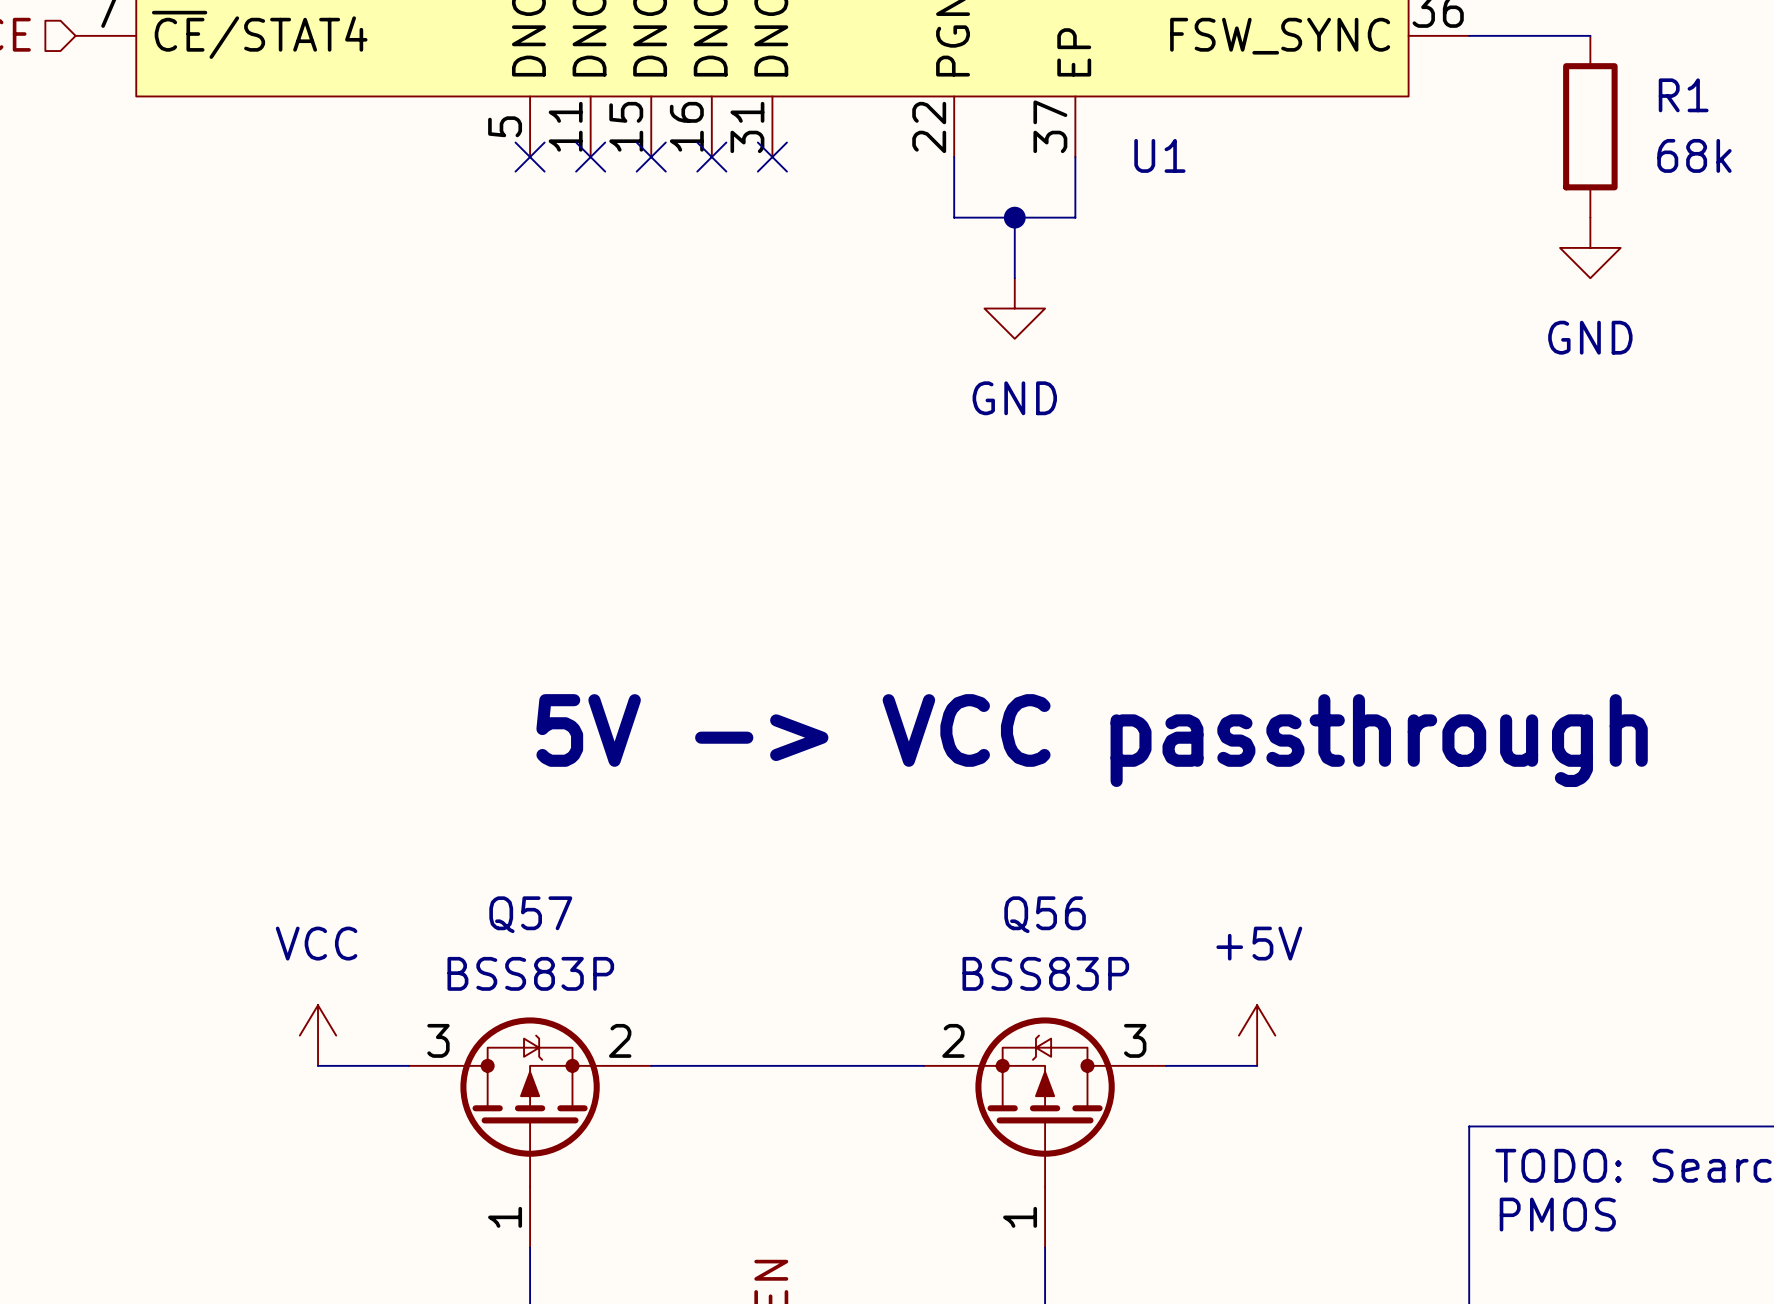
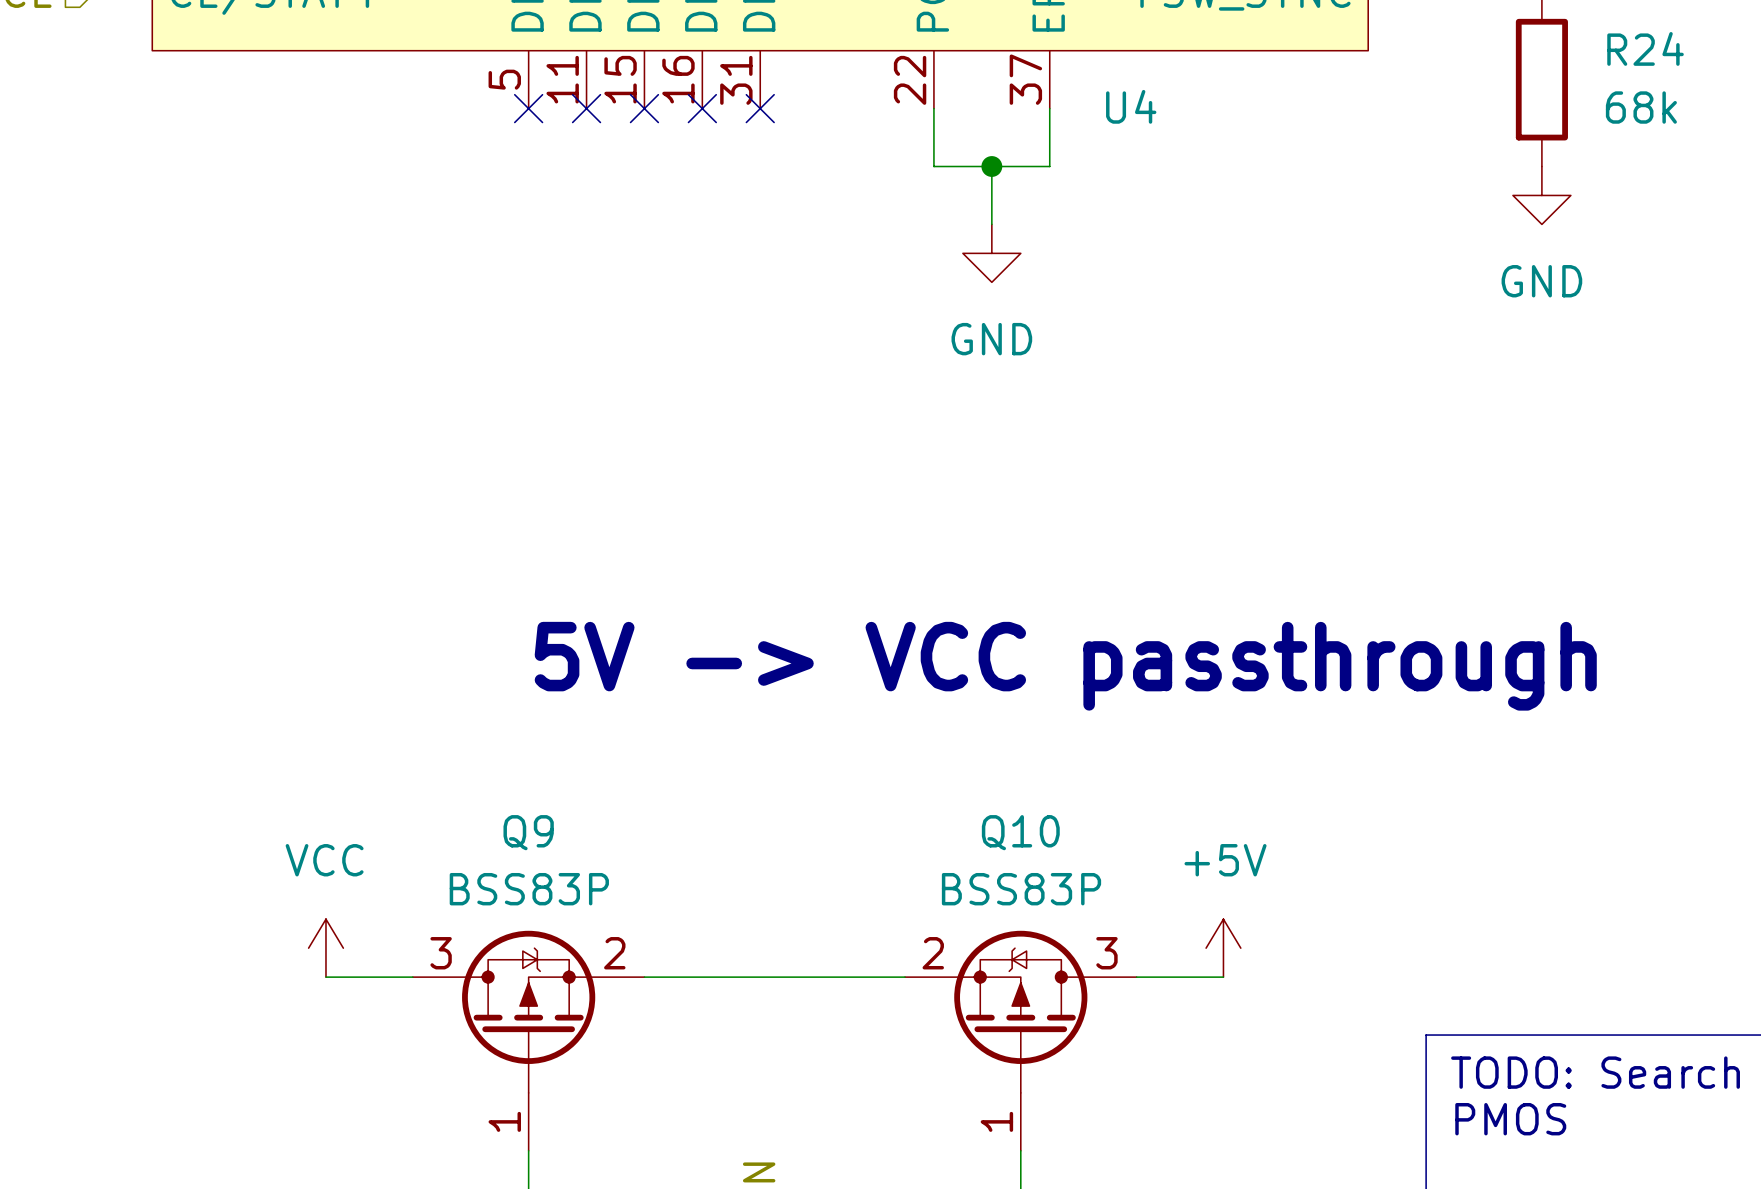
R1 name: R1 (1683, 95) -> R24 (1645, 48)
U1 name: U1 (1159, 155) -> U4 (1131, 106)
Q57 name: Q57 (530, 914) -> Q9 (528, 832)
Q56 name: Q56 (1045, 914) -> Q10 (1020, 832)

